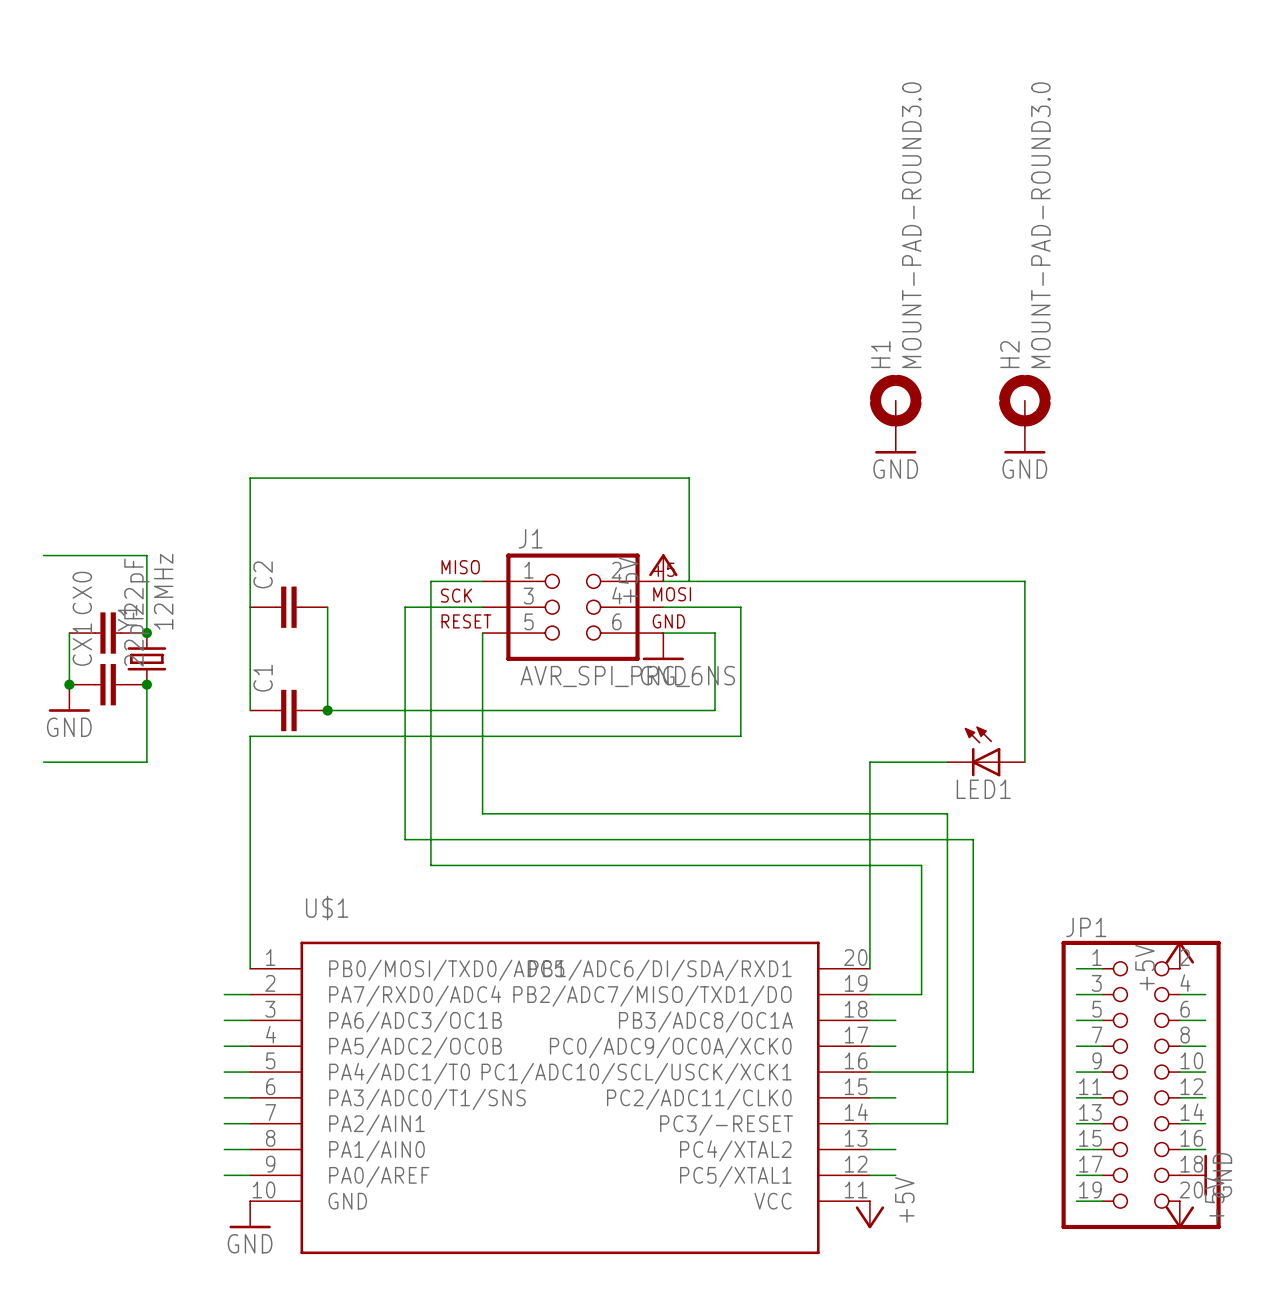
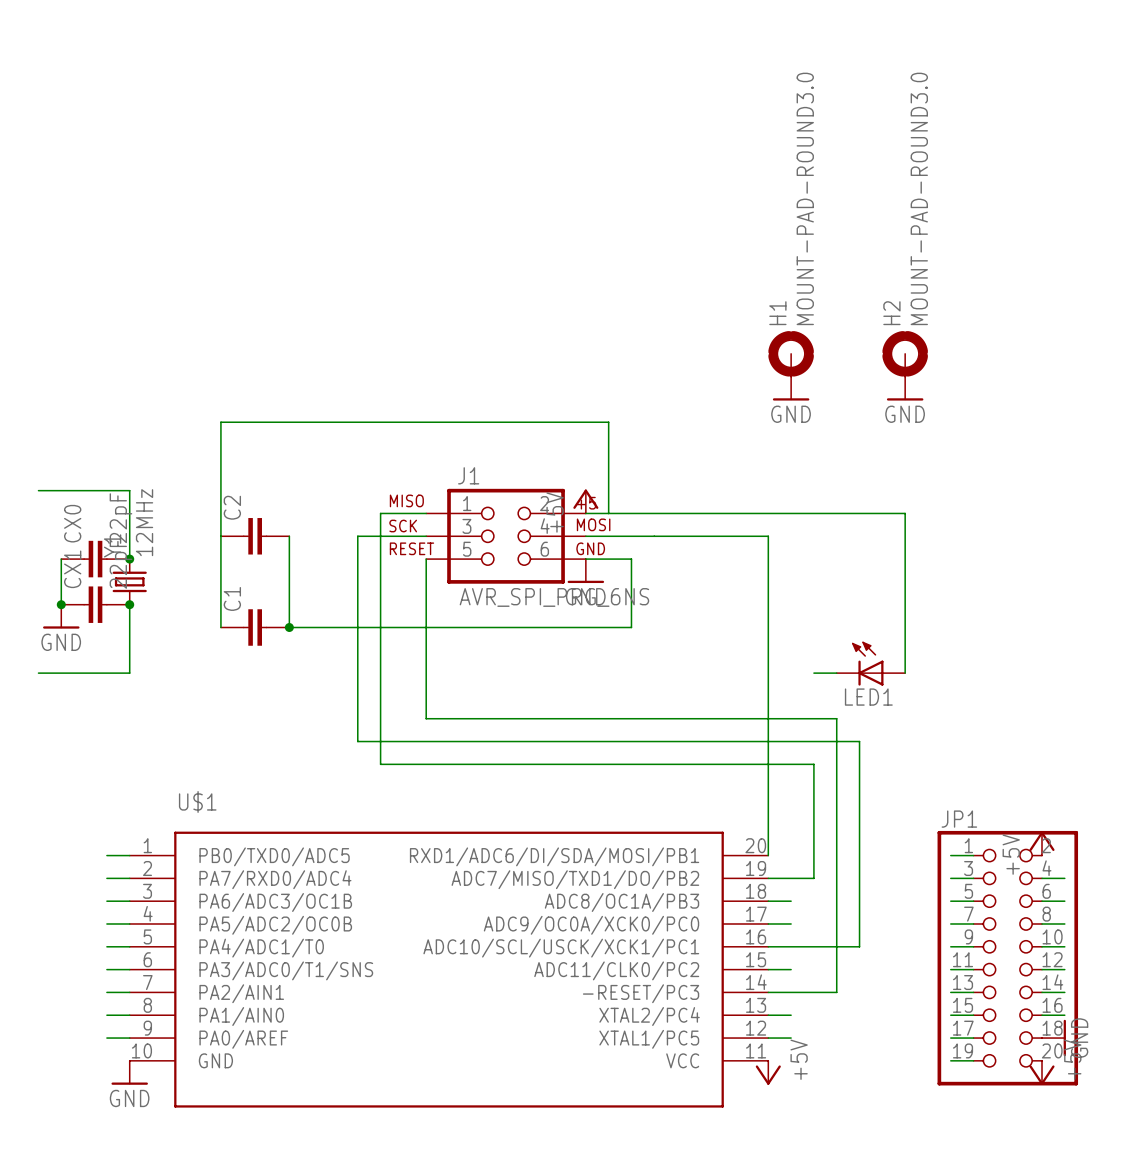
wire: (740, 607) (740, 736) (250, 736) (250, 968) -> none
wire: (869, 762) (921, 762) -> (768, 673) (768, 536) (654, 536)
U$1 name position: U$1 (327, 908) -> U$1 (197, 801)
U$1 symbol: [250, 941, 870, 1255] -> [129, 831, 769, 1108]
wire: none -> (106, 855) (129, 855)
wire: (224, 994) (250, 994) -> (106, 878) (129, 878)
wire: (224, 1020) (250, 1020) -> (106, 901) (129, 901)
wire: (224, 1046) (250, 1046) -> (106, 923) (129, 923)
wire: (224, 1072) (250, 1072) -> (106, 946) (129, 946)
wire: (224, 1097) (250, 1097) -> (106, 969) (129, 969)
wire: (224, 1123) (250, 1123) -> (106, 992) (129, 992)
wire: (224, 1149) (250, 1149) -> (106, 1015) (129, 1015)
wire: (224, 1175) (250, 1175) -> (106, 1038) (129, 1038)
power symbol position: GND (250, 1214) -> GND (129, 1072)

